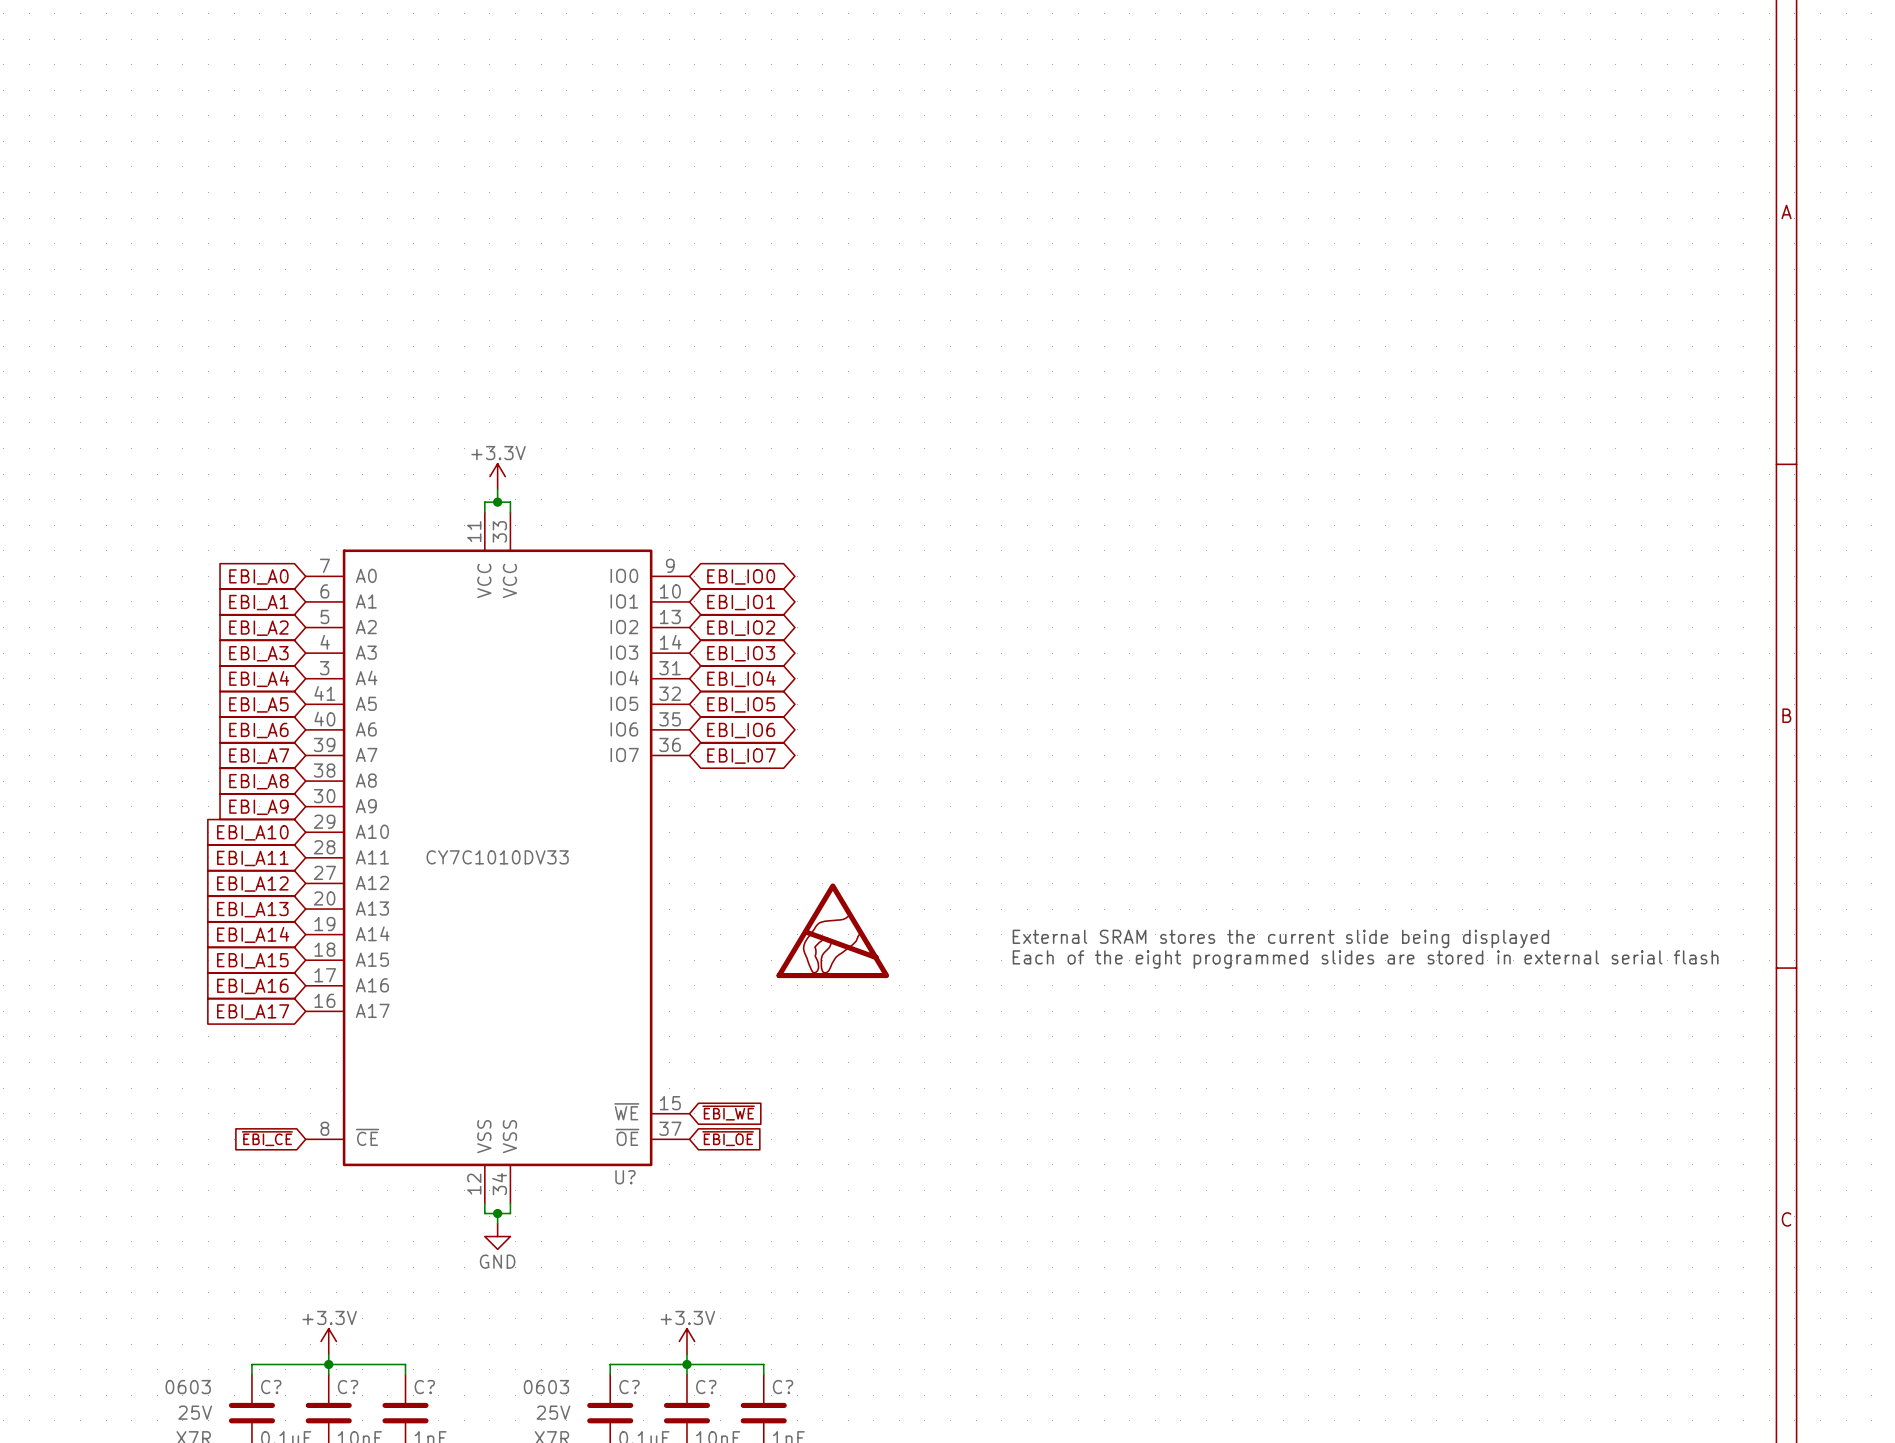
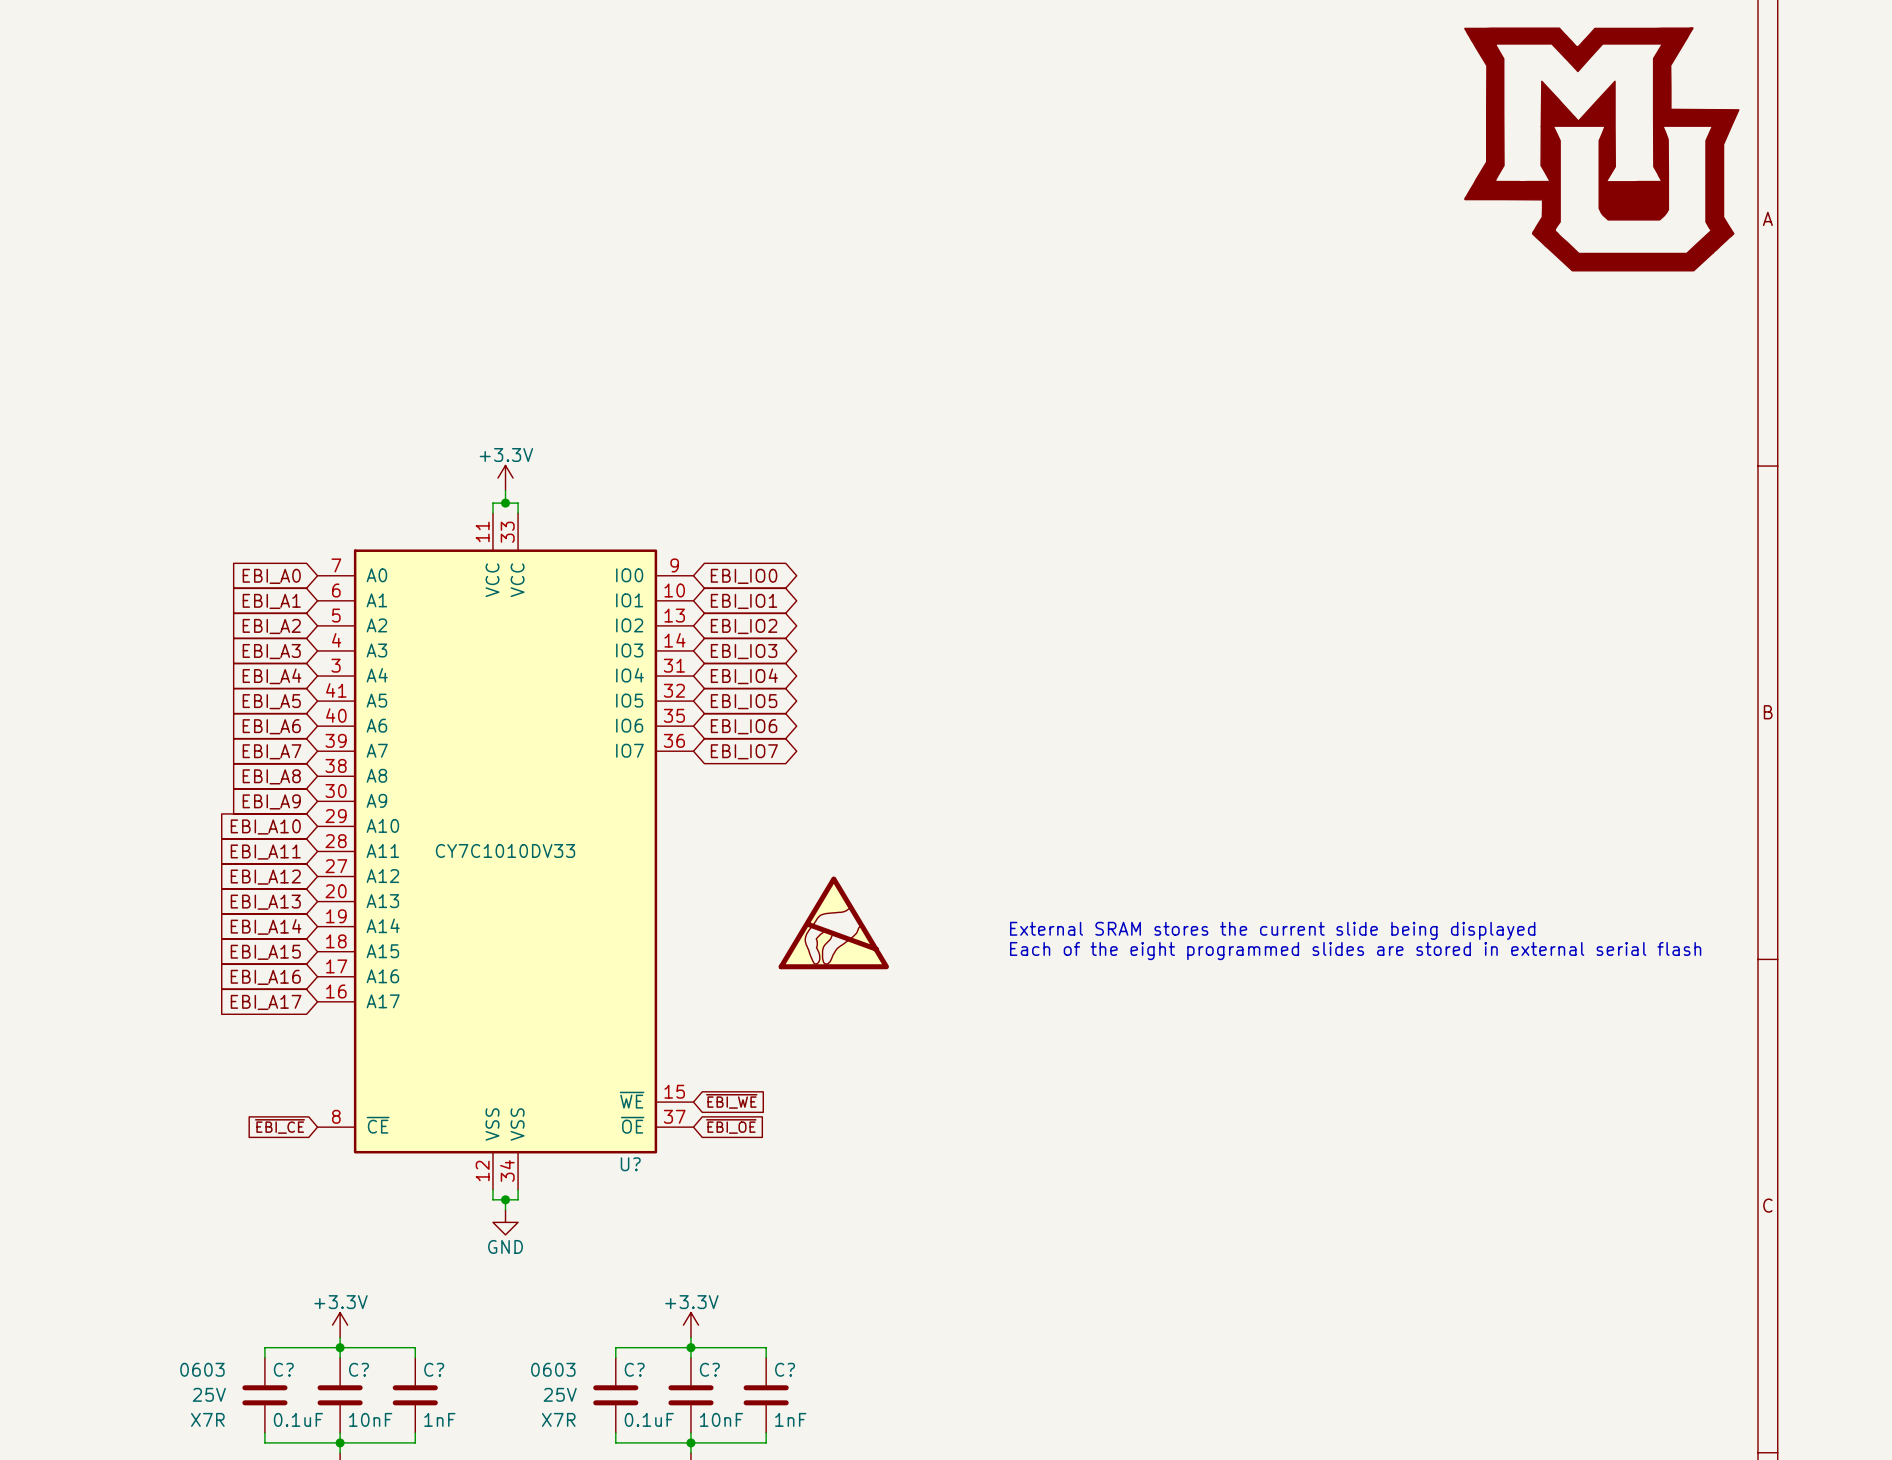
power symbol: none -> (1601, 149)

